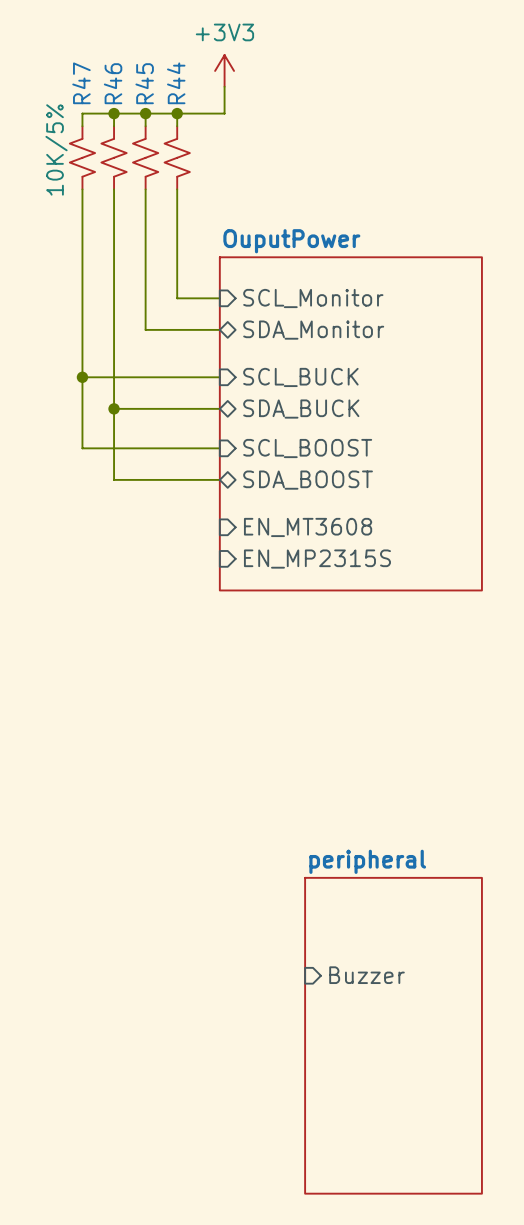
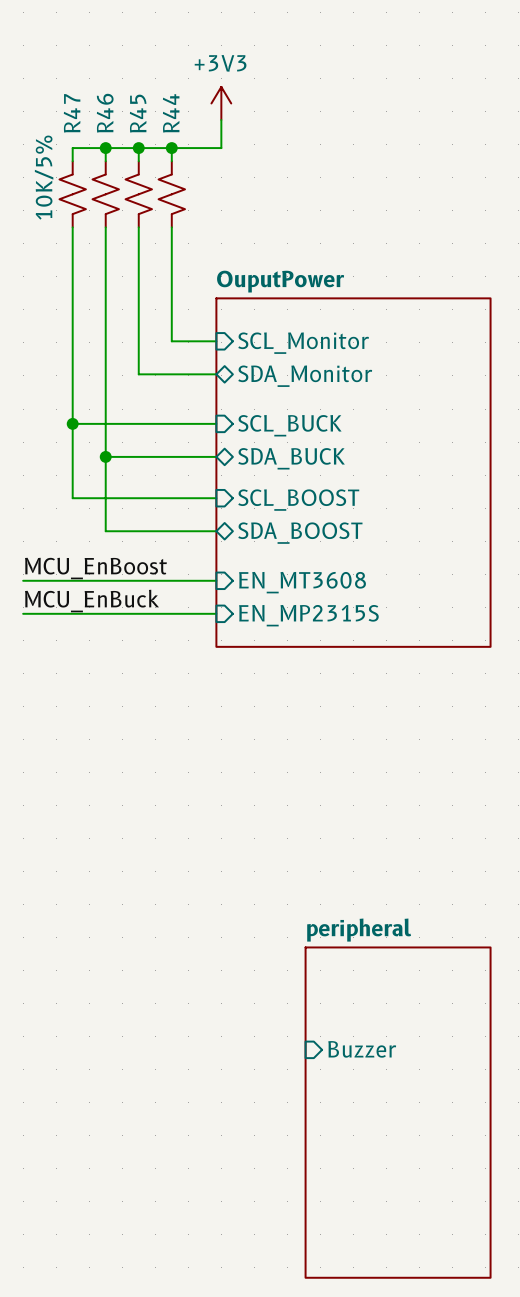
label: none -> MCU_EnBoost (95, 568)
wire: none -> (23, 580) (216, 580)
label: none -> MCU_EnBuck (91, 601)
wire: none -> (23, 613) (216, 613)

